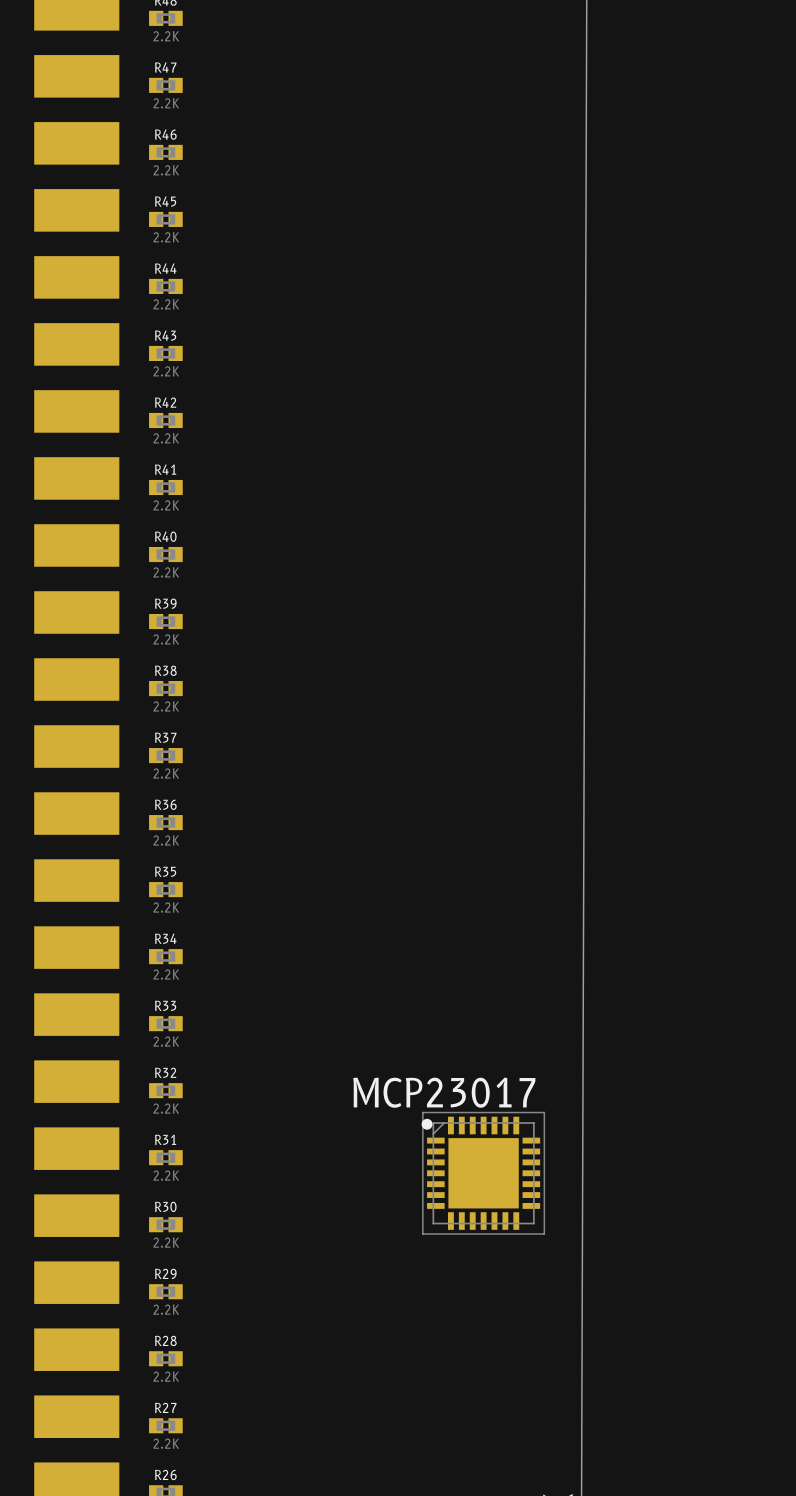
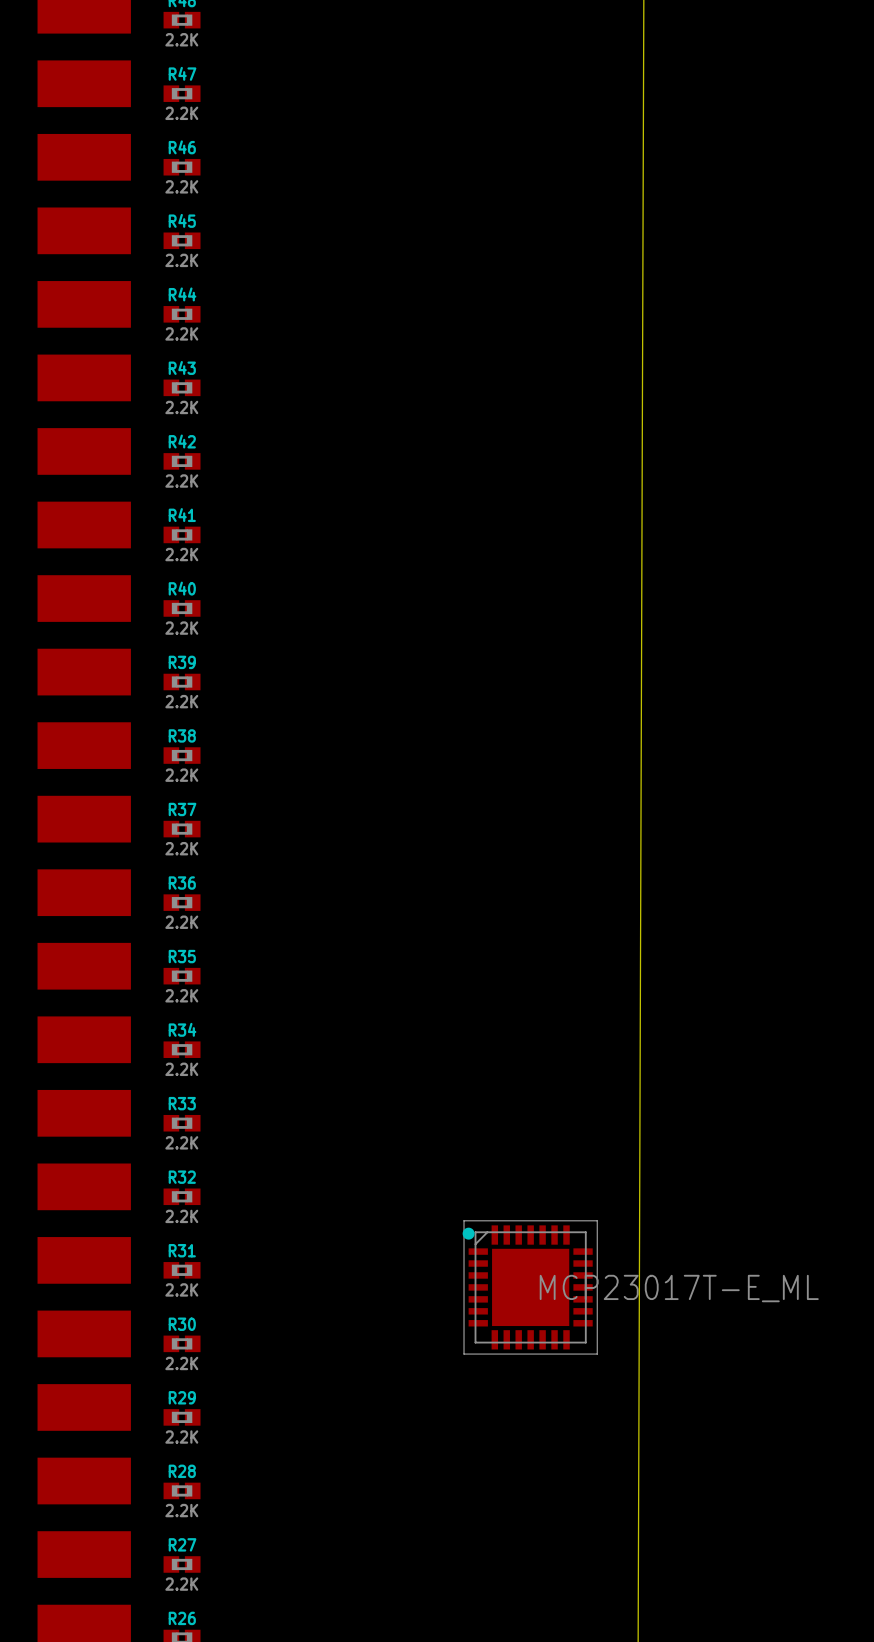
text: MCP23017 (444, 1092) -> none
part value: none -> MCP23017T-E_ML (679, 1288)

